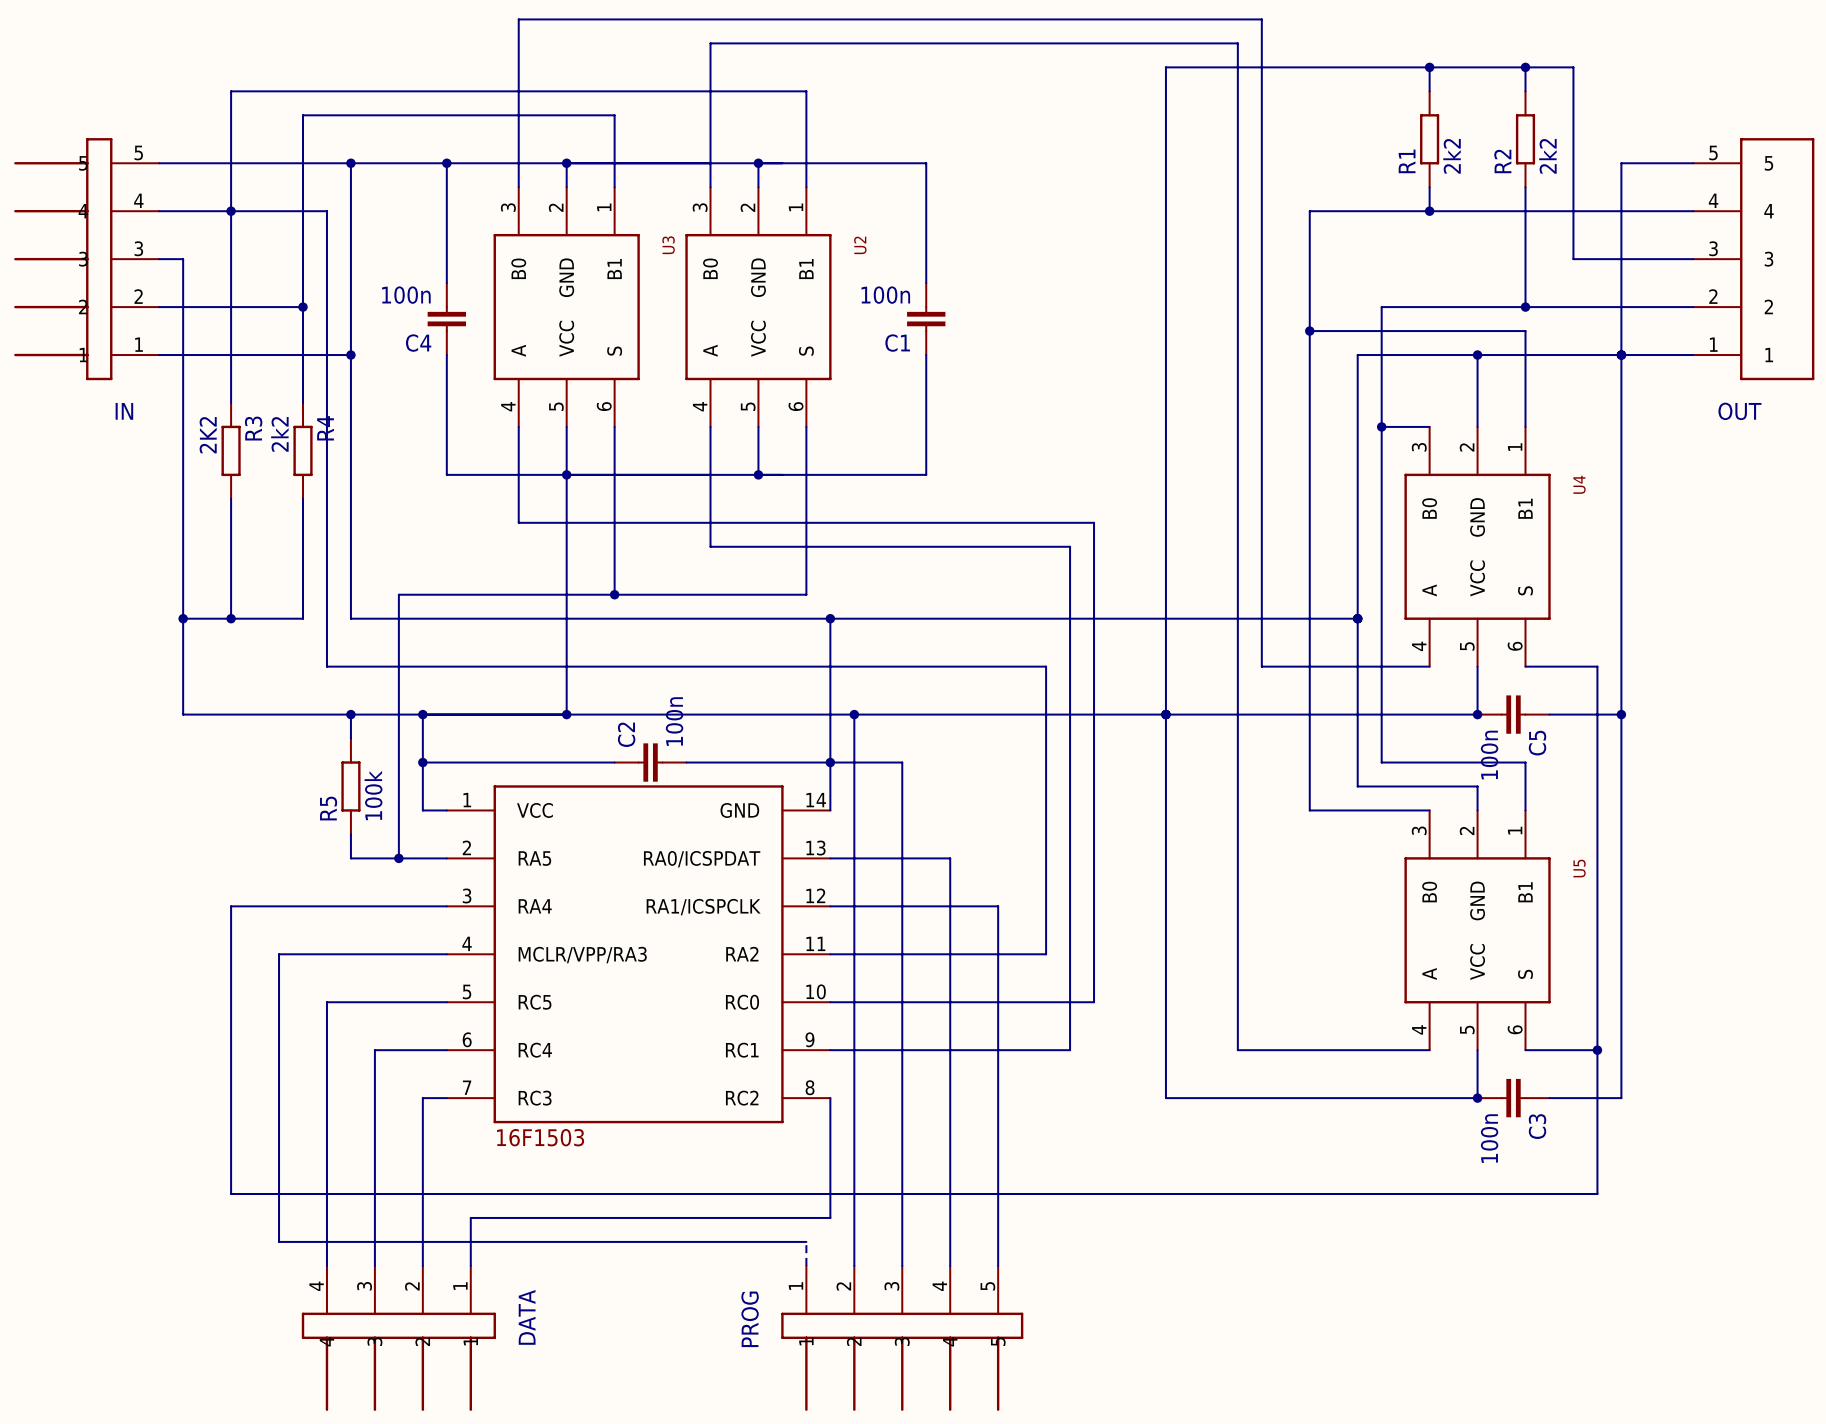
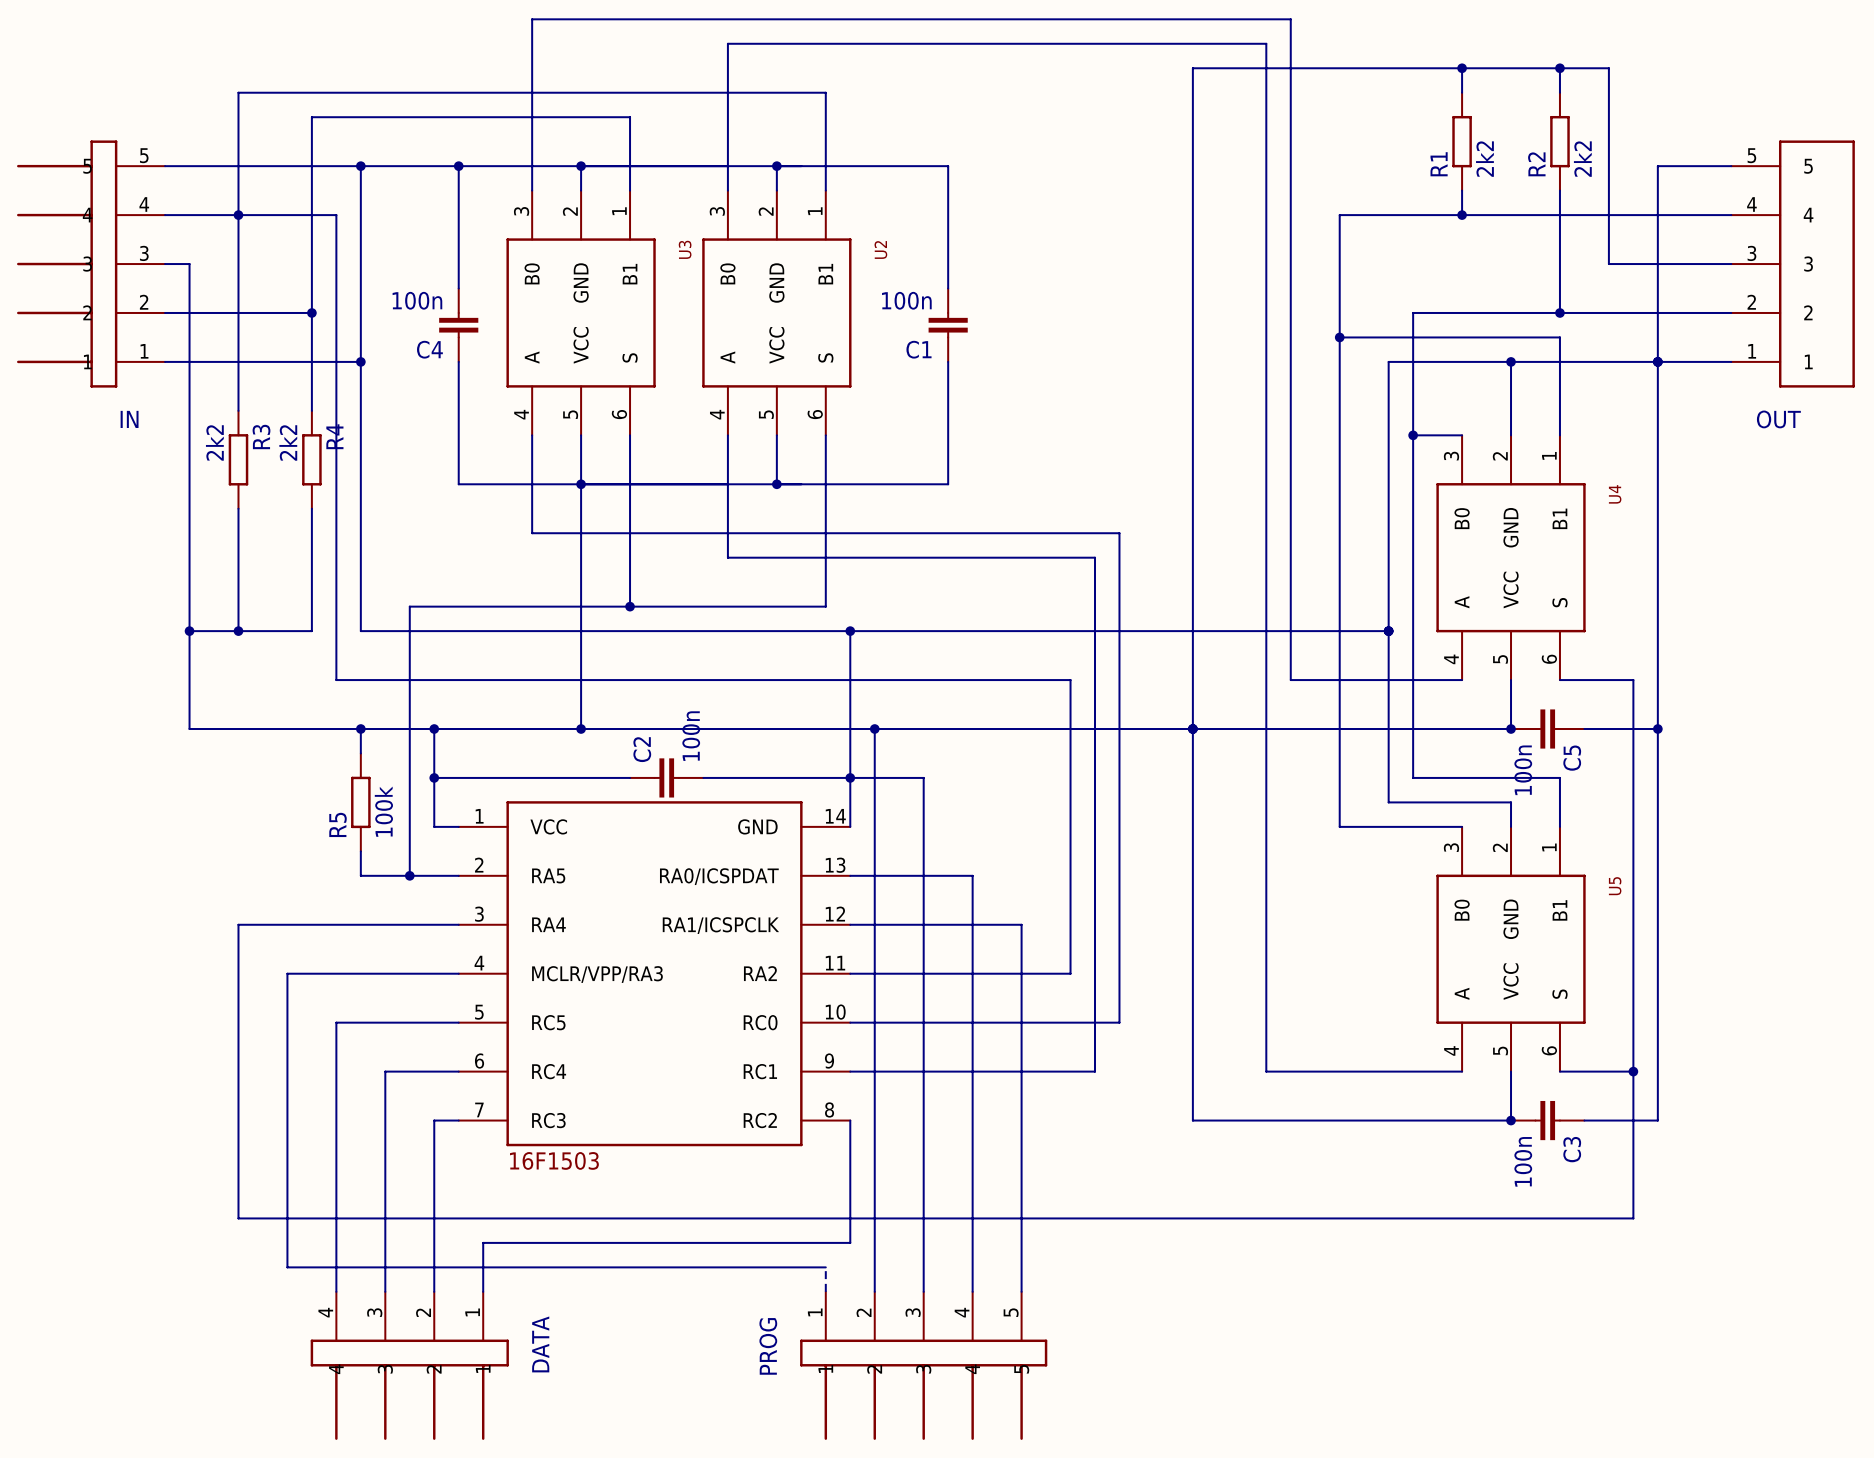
R3 value: 2K2 (208, 435) -> 2k2 (214, 442)

